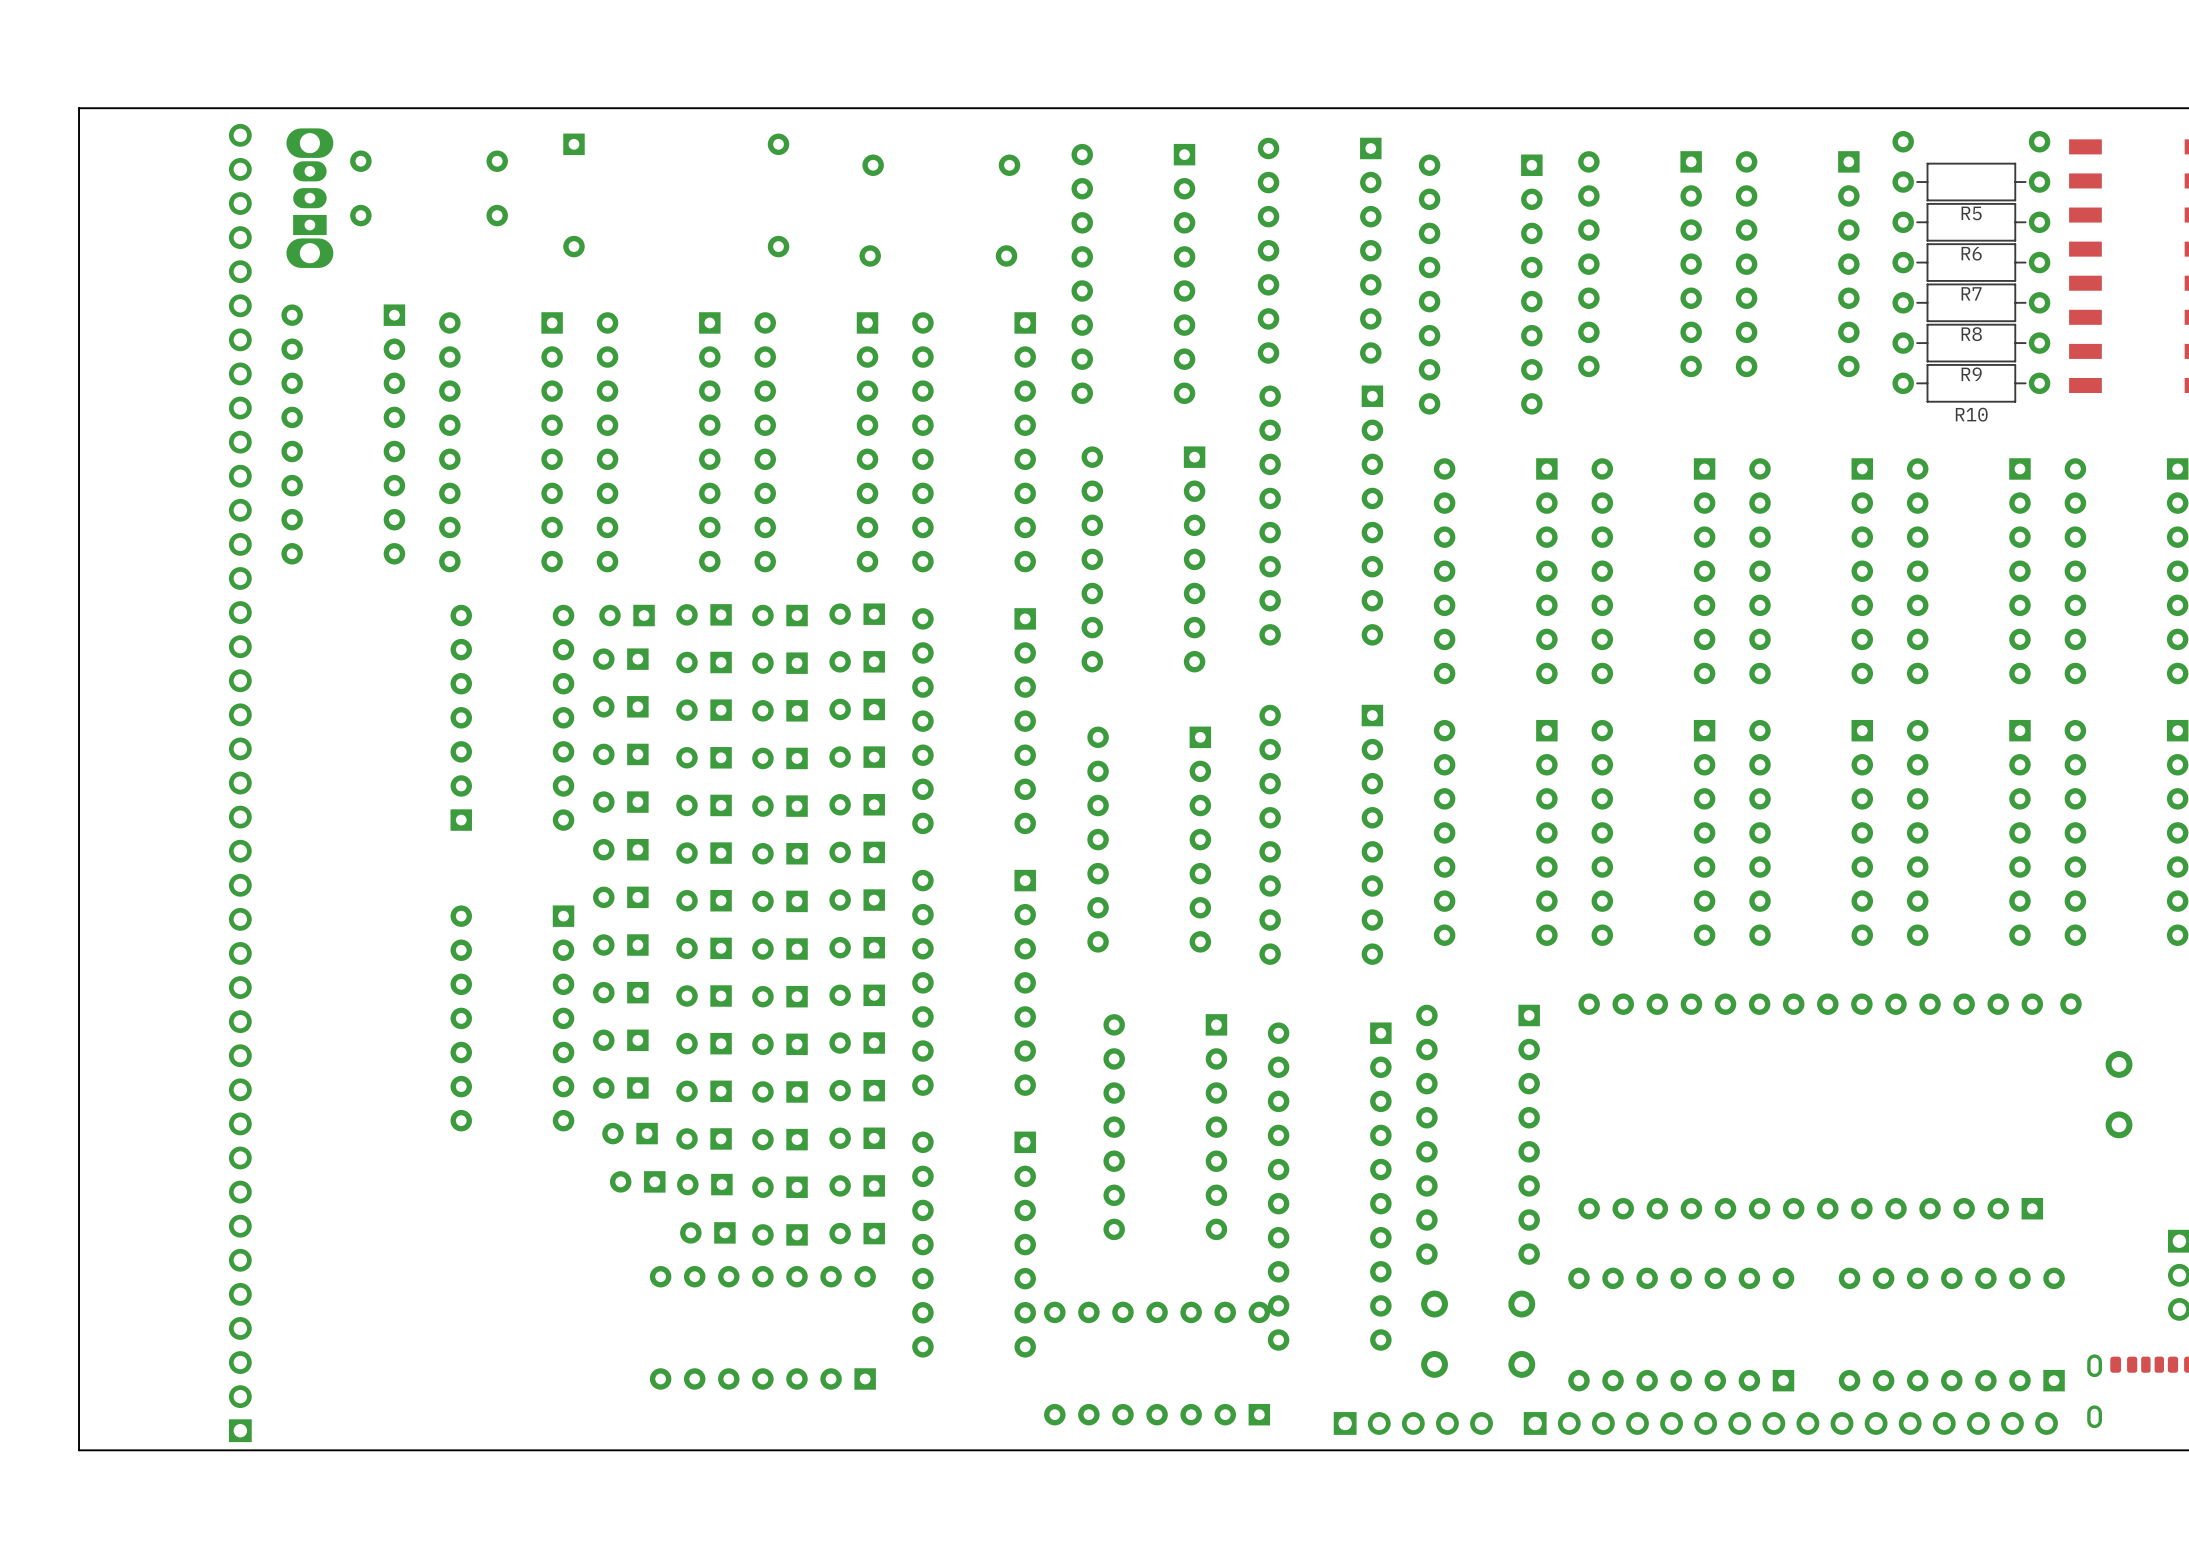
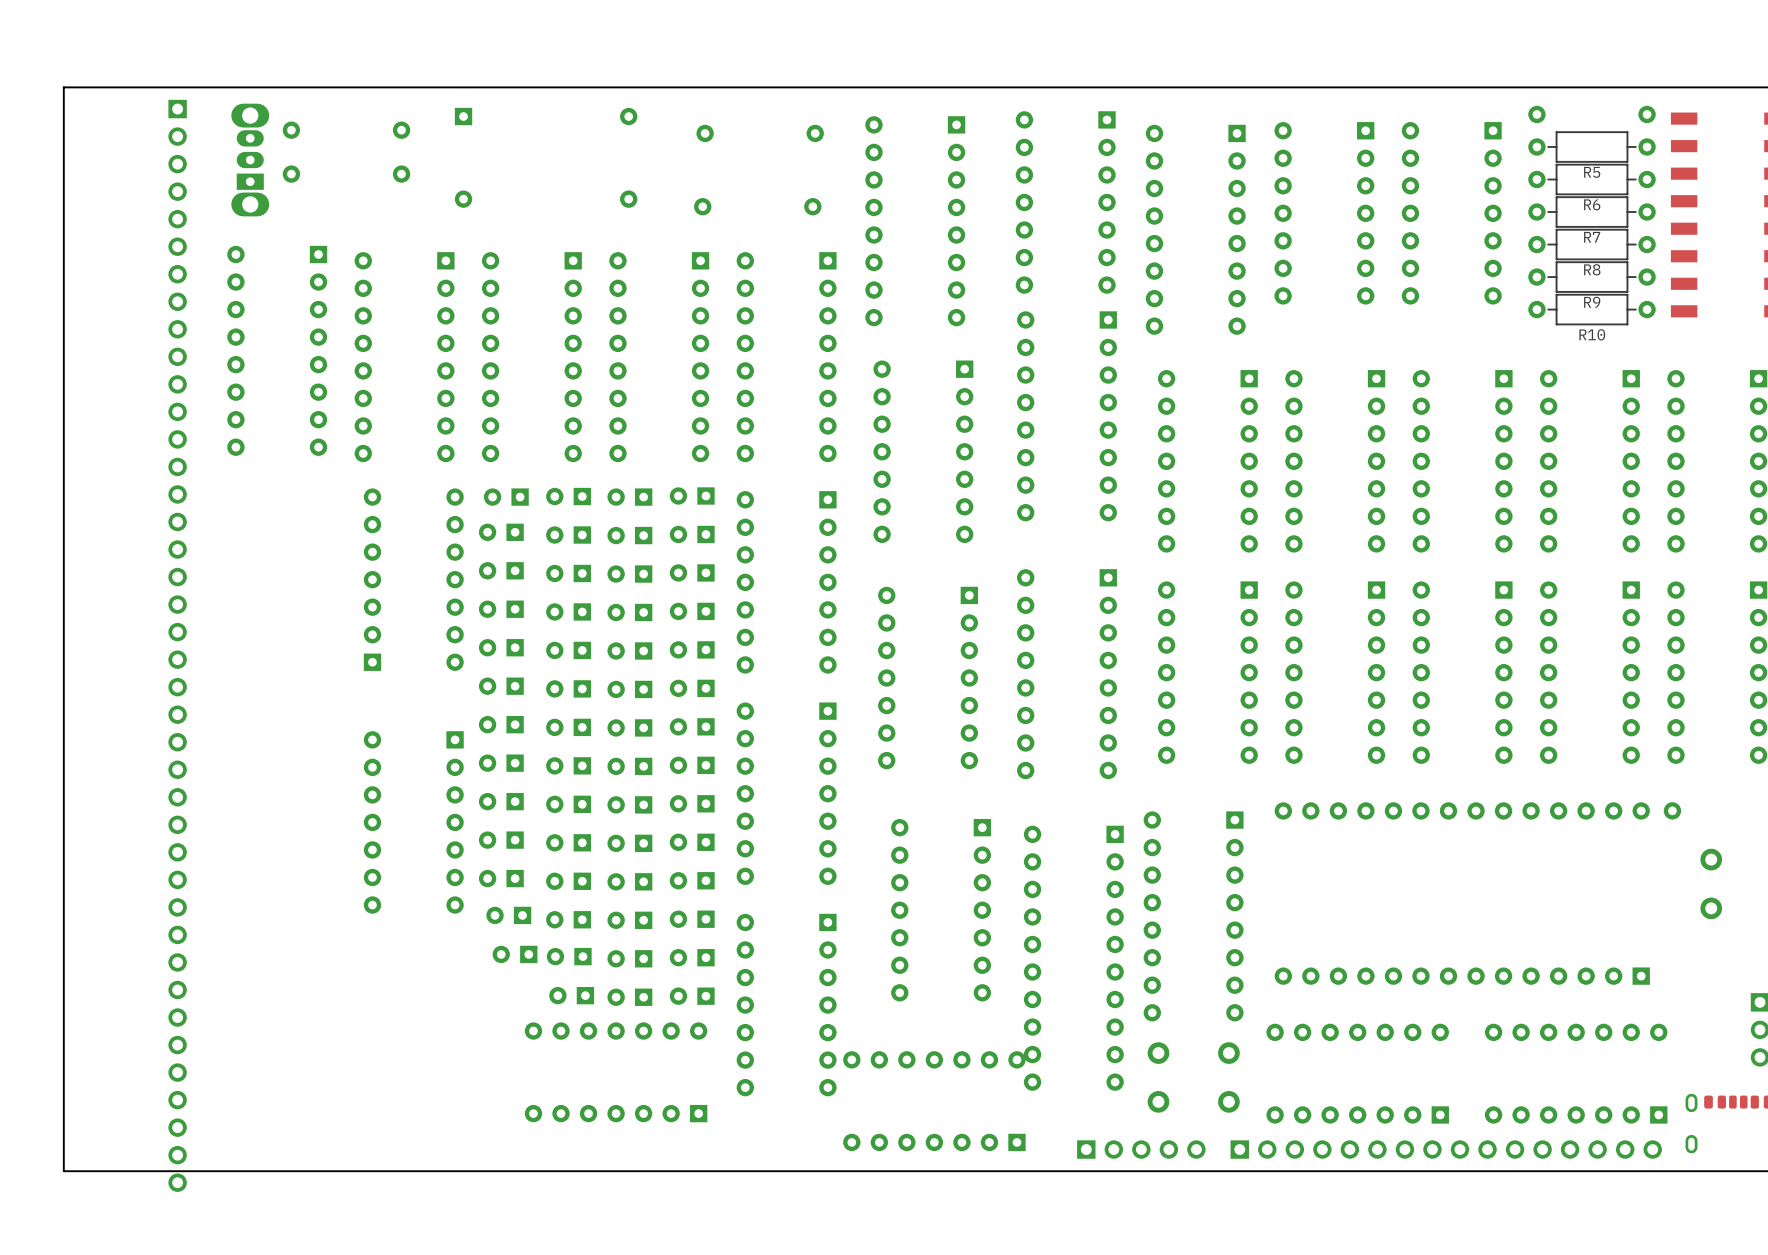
part: (240, 783) -> none
part: none -> (177, 645)

